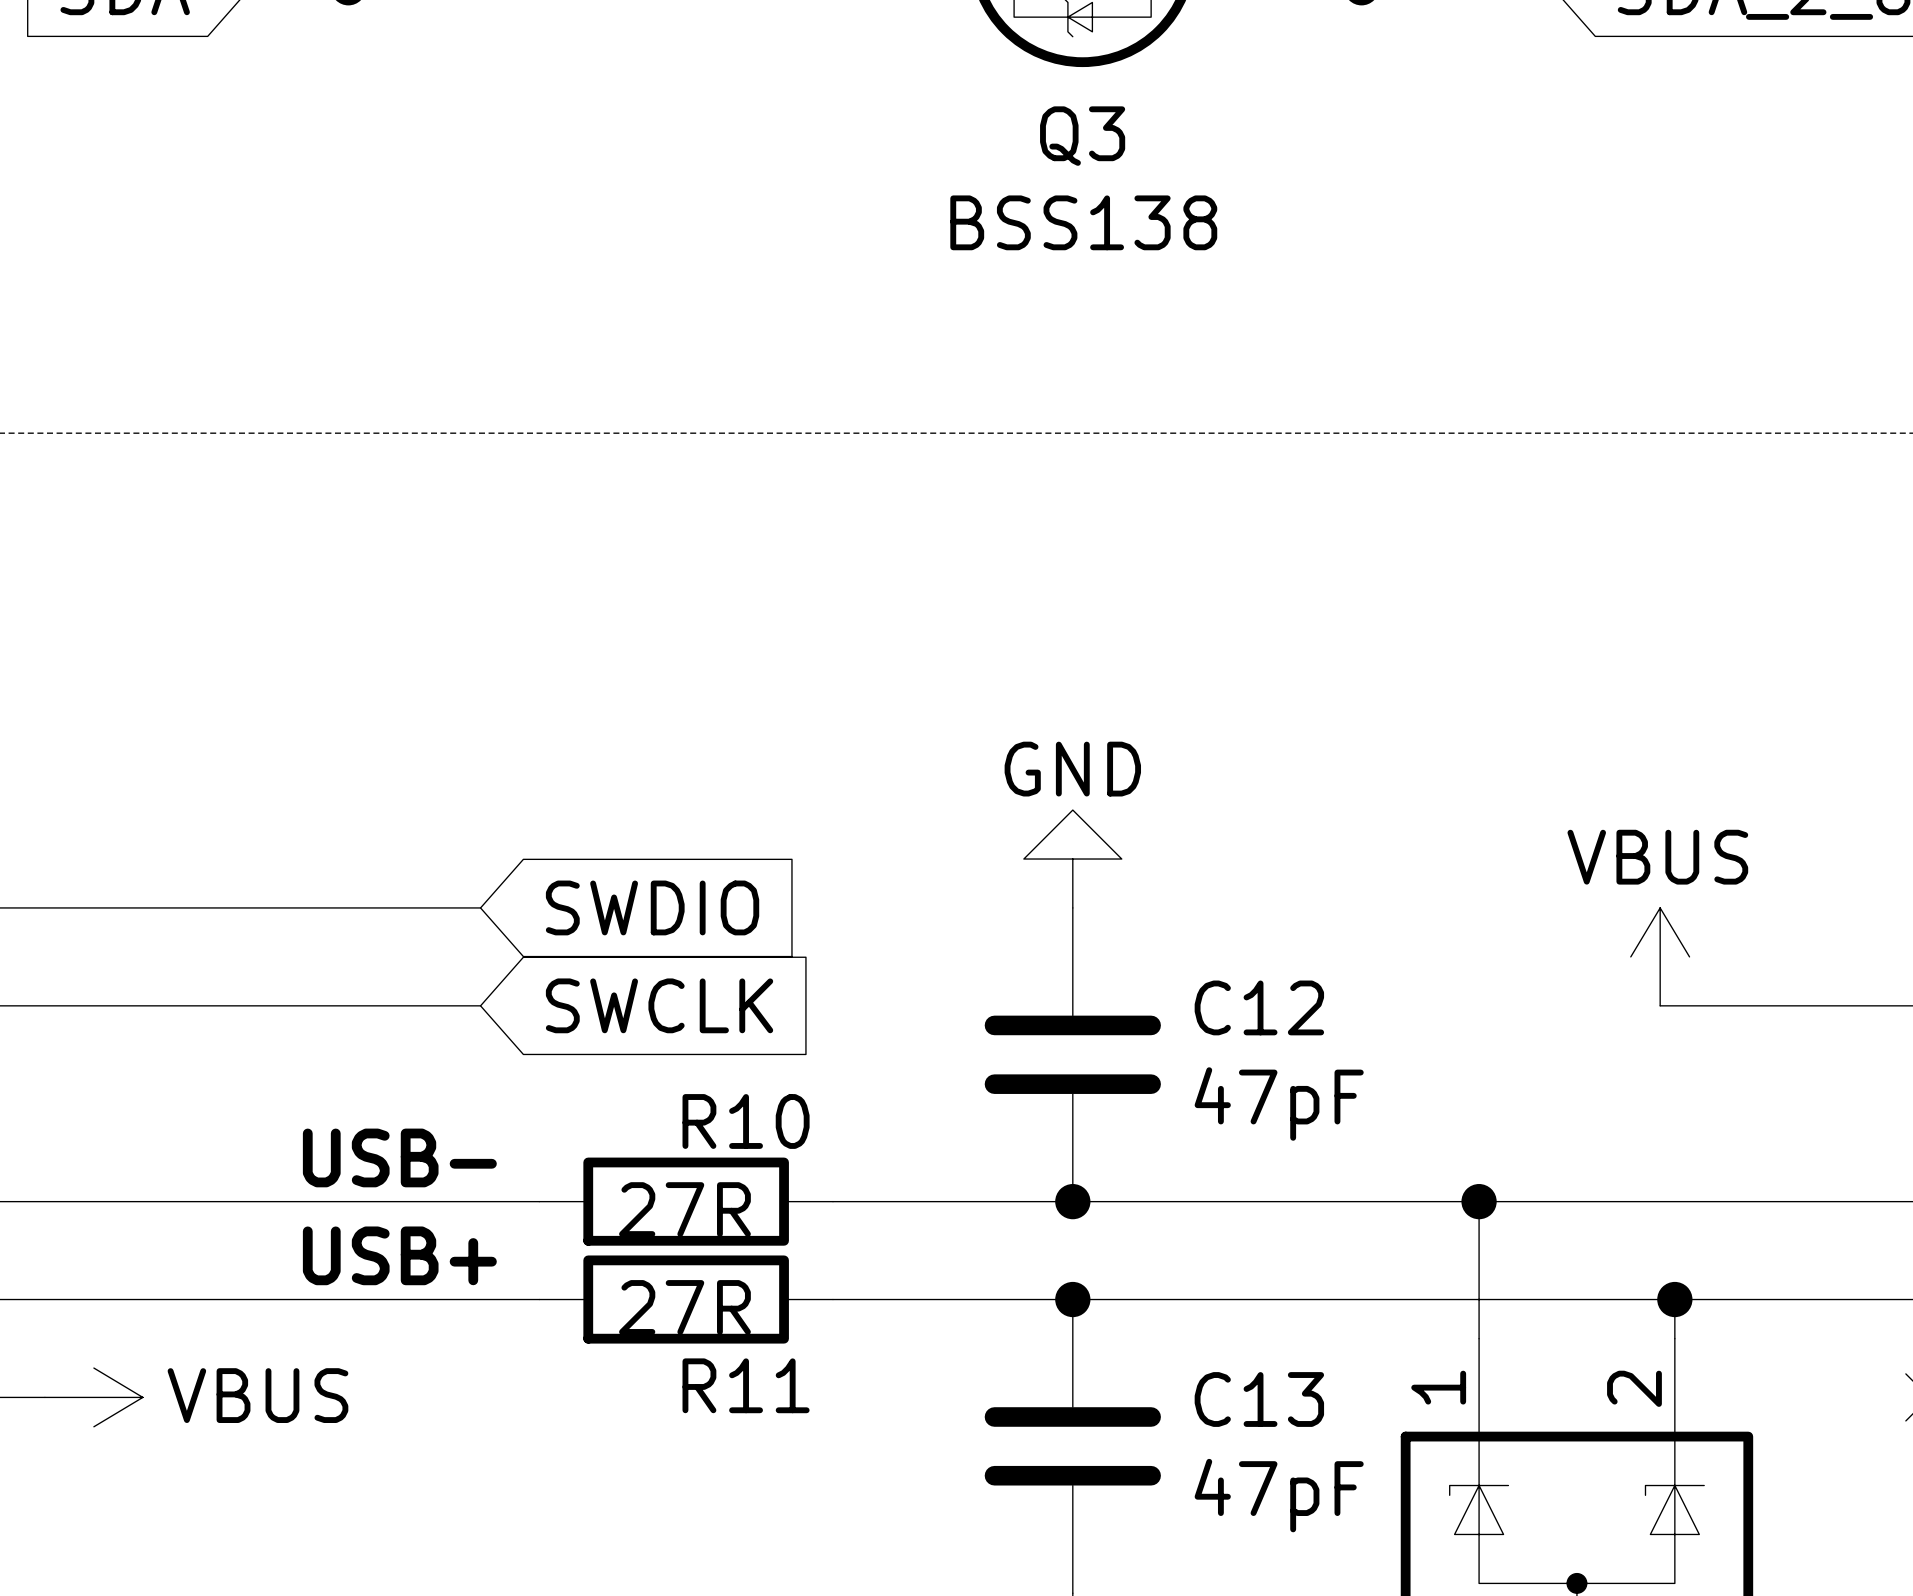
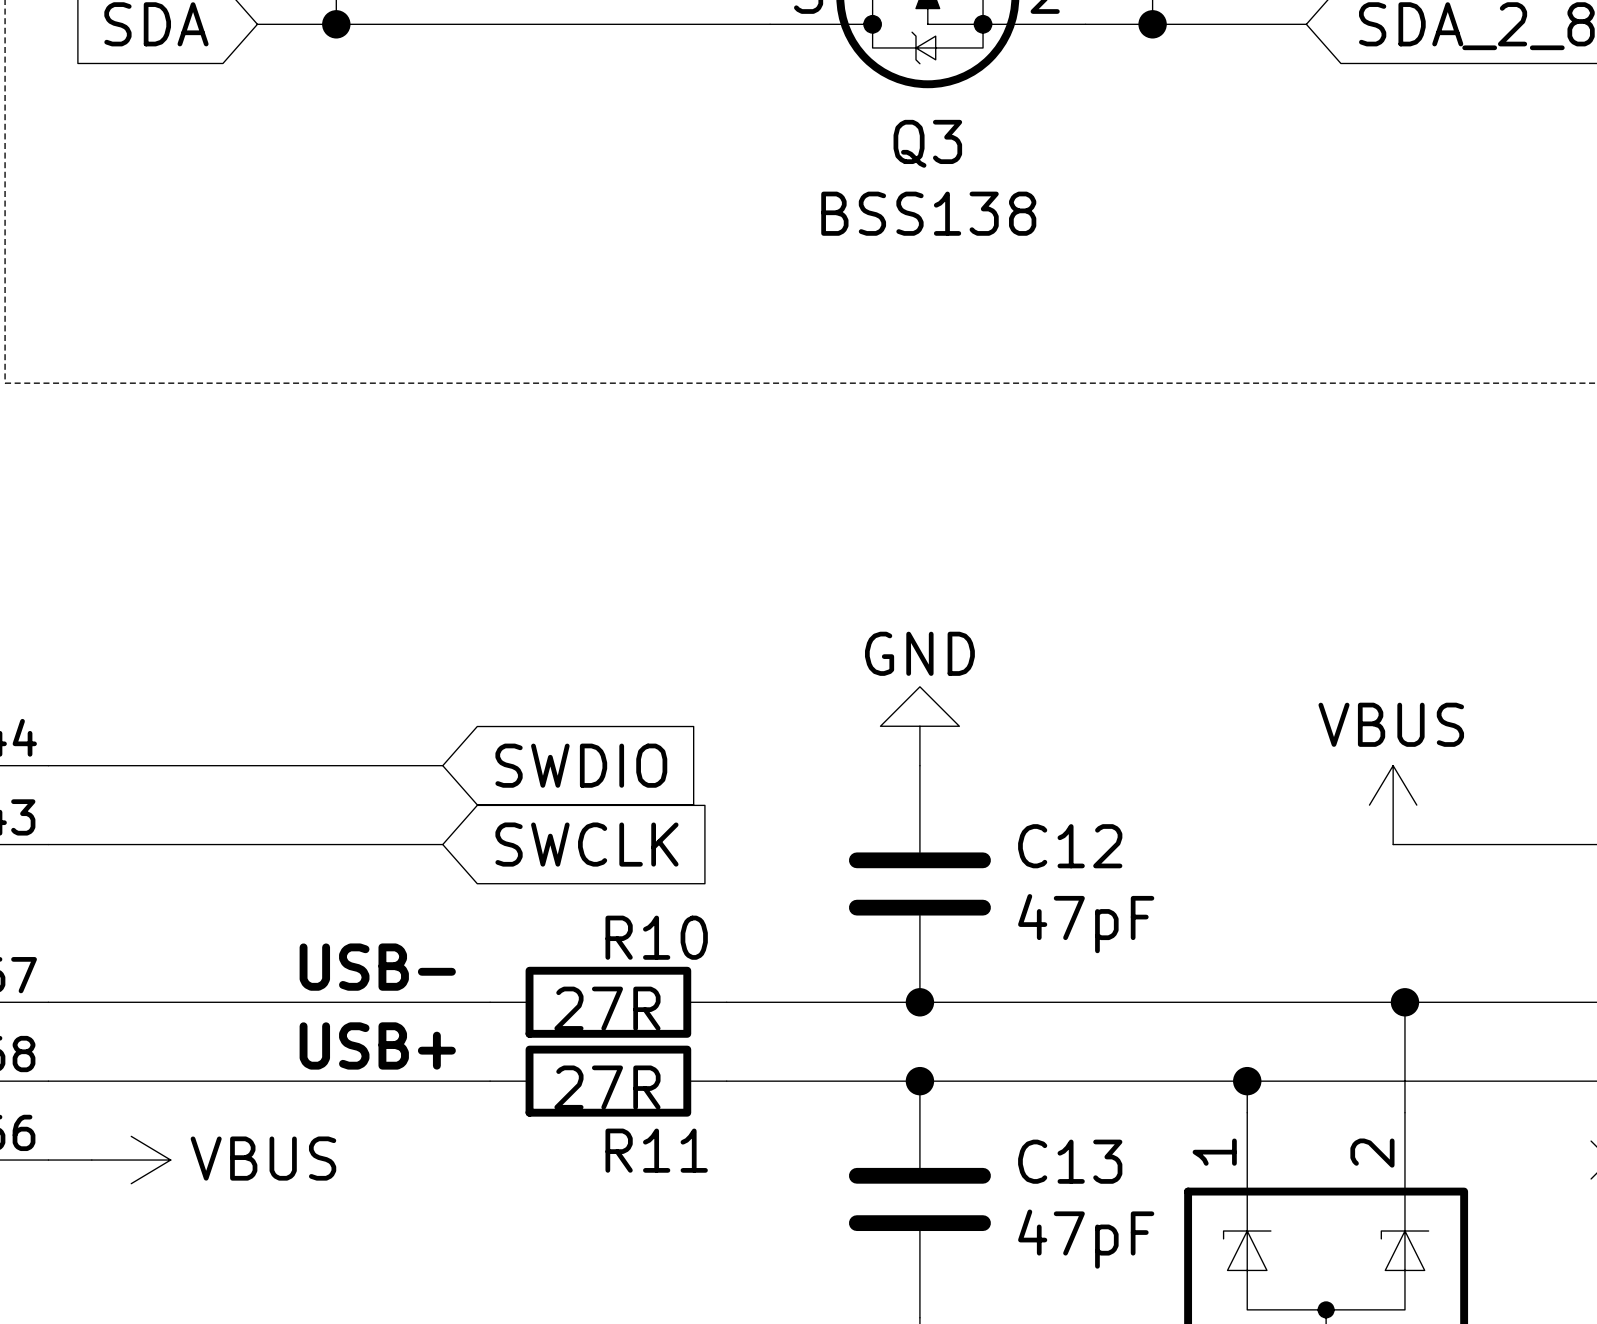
wire: (1479, 1201) (1479, 1299) -> (1404, 1002) (1404, 1081)
junction: (1479, 1201) -> none
junction: none -> (1404, 1002)
junction: none -> (1247, 1081)
junction: (1674, 1299) -> none

